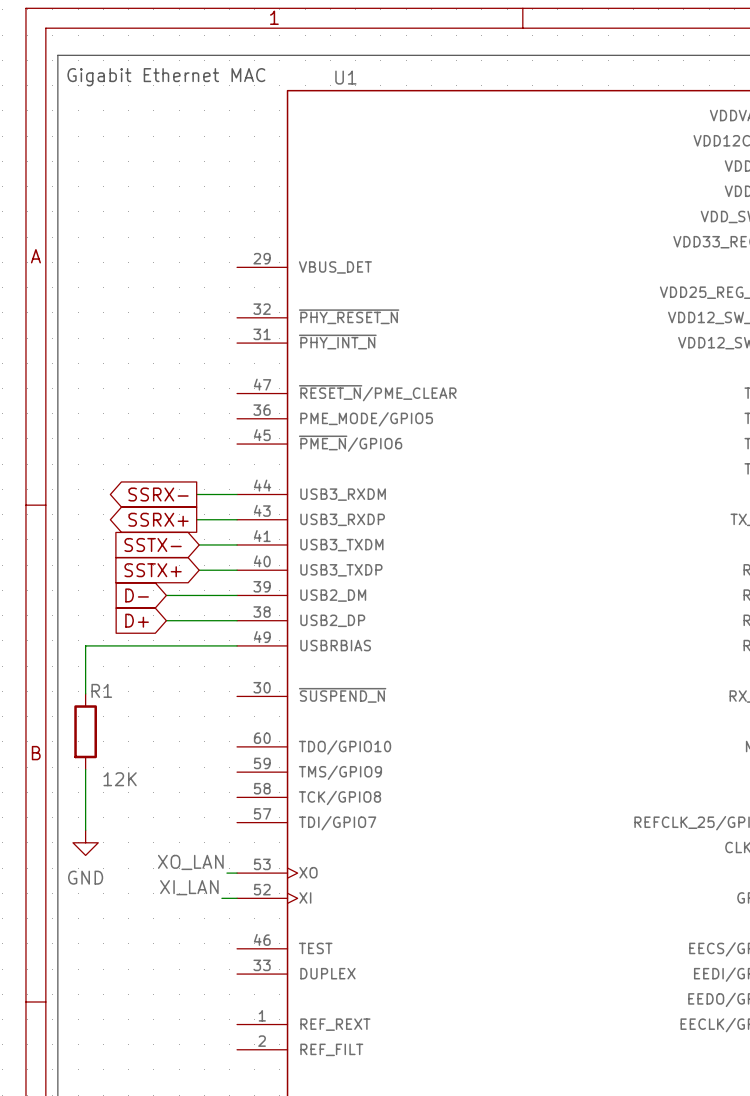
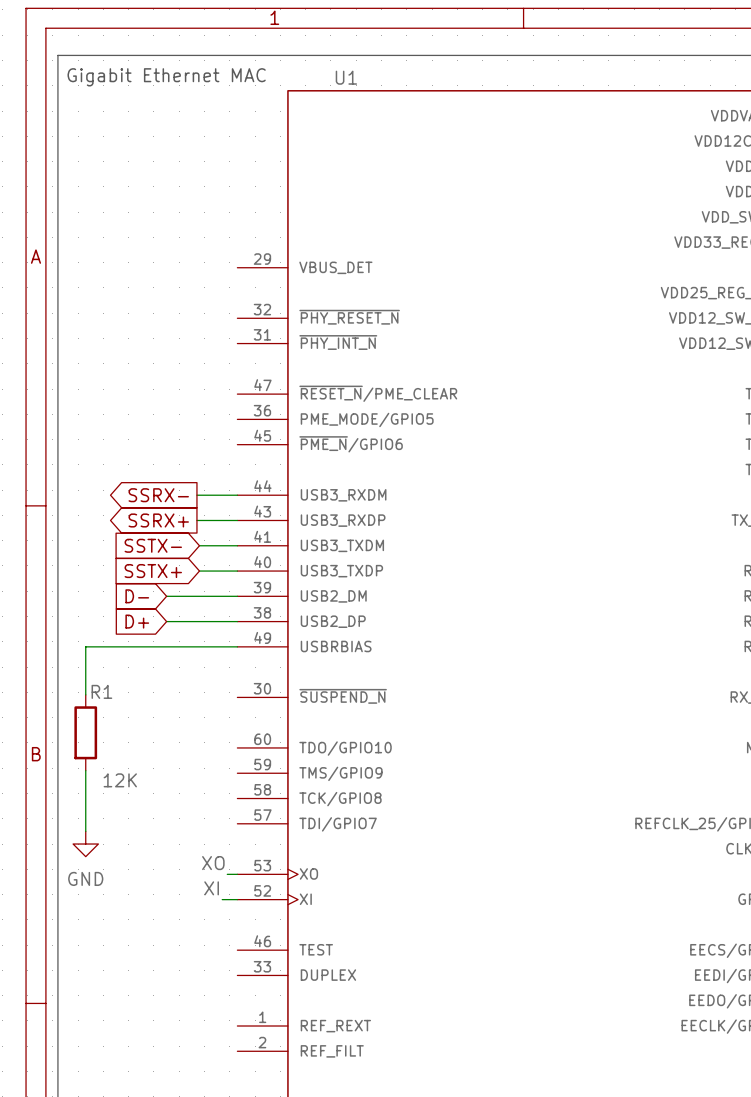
label: XO_LAN (190, 862) -> XO (213, 863)
label: XI_LAN (189, 887) -> XI (211, 888)

